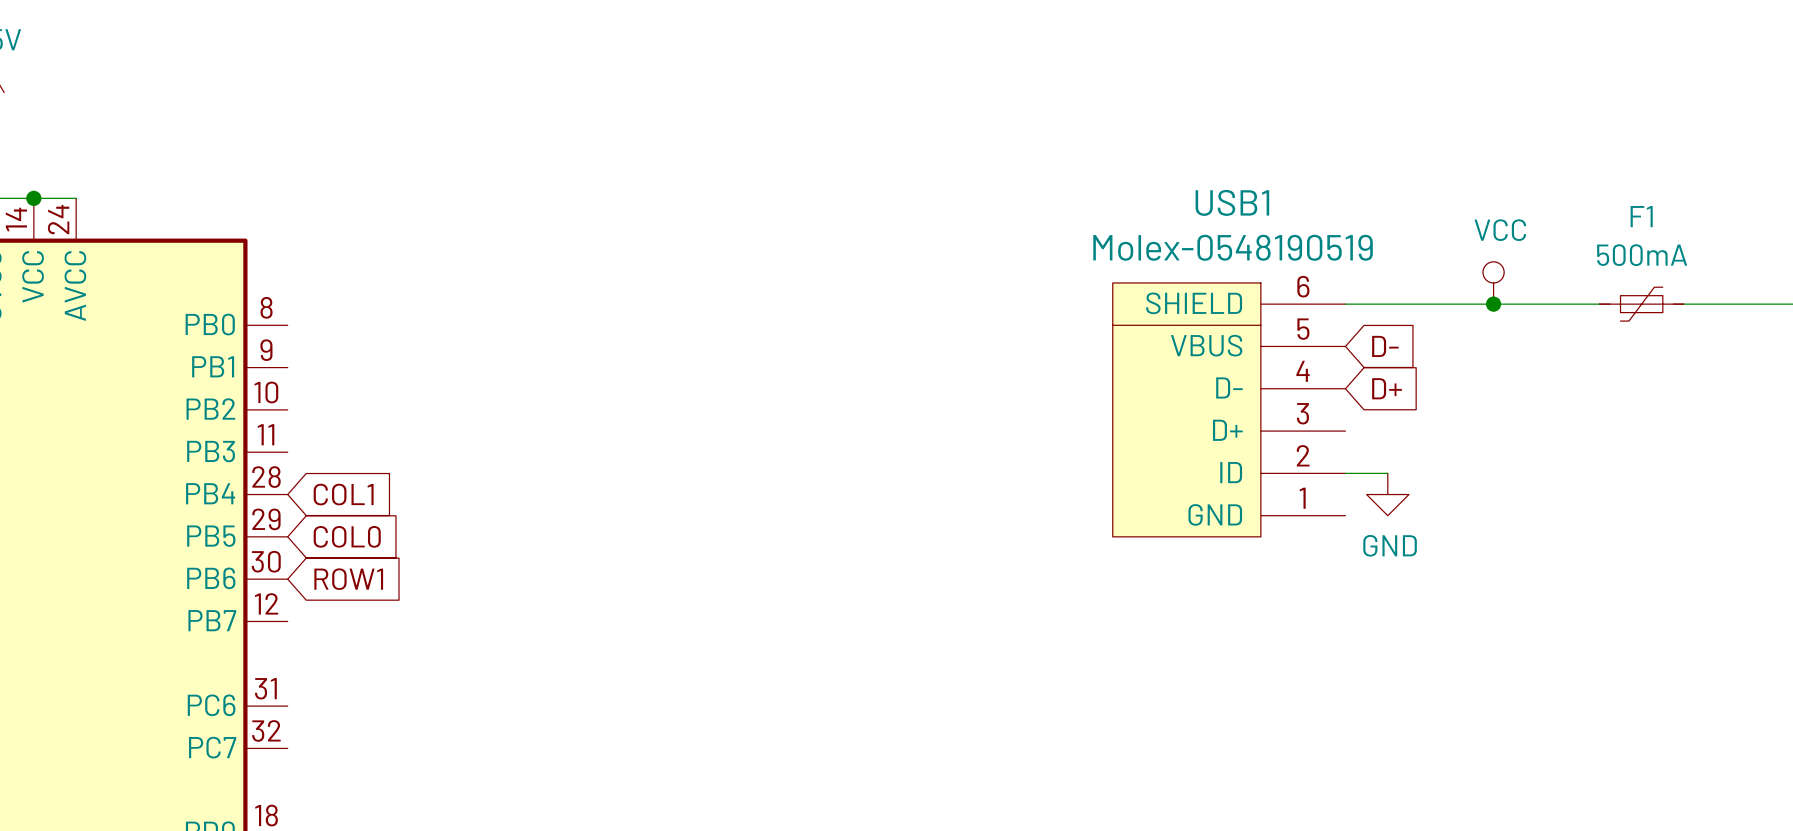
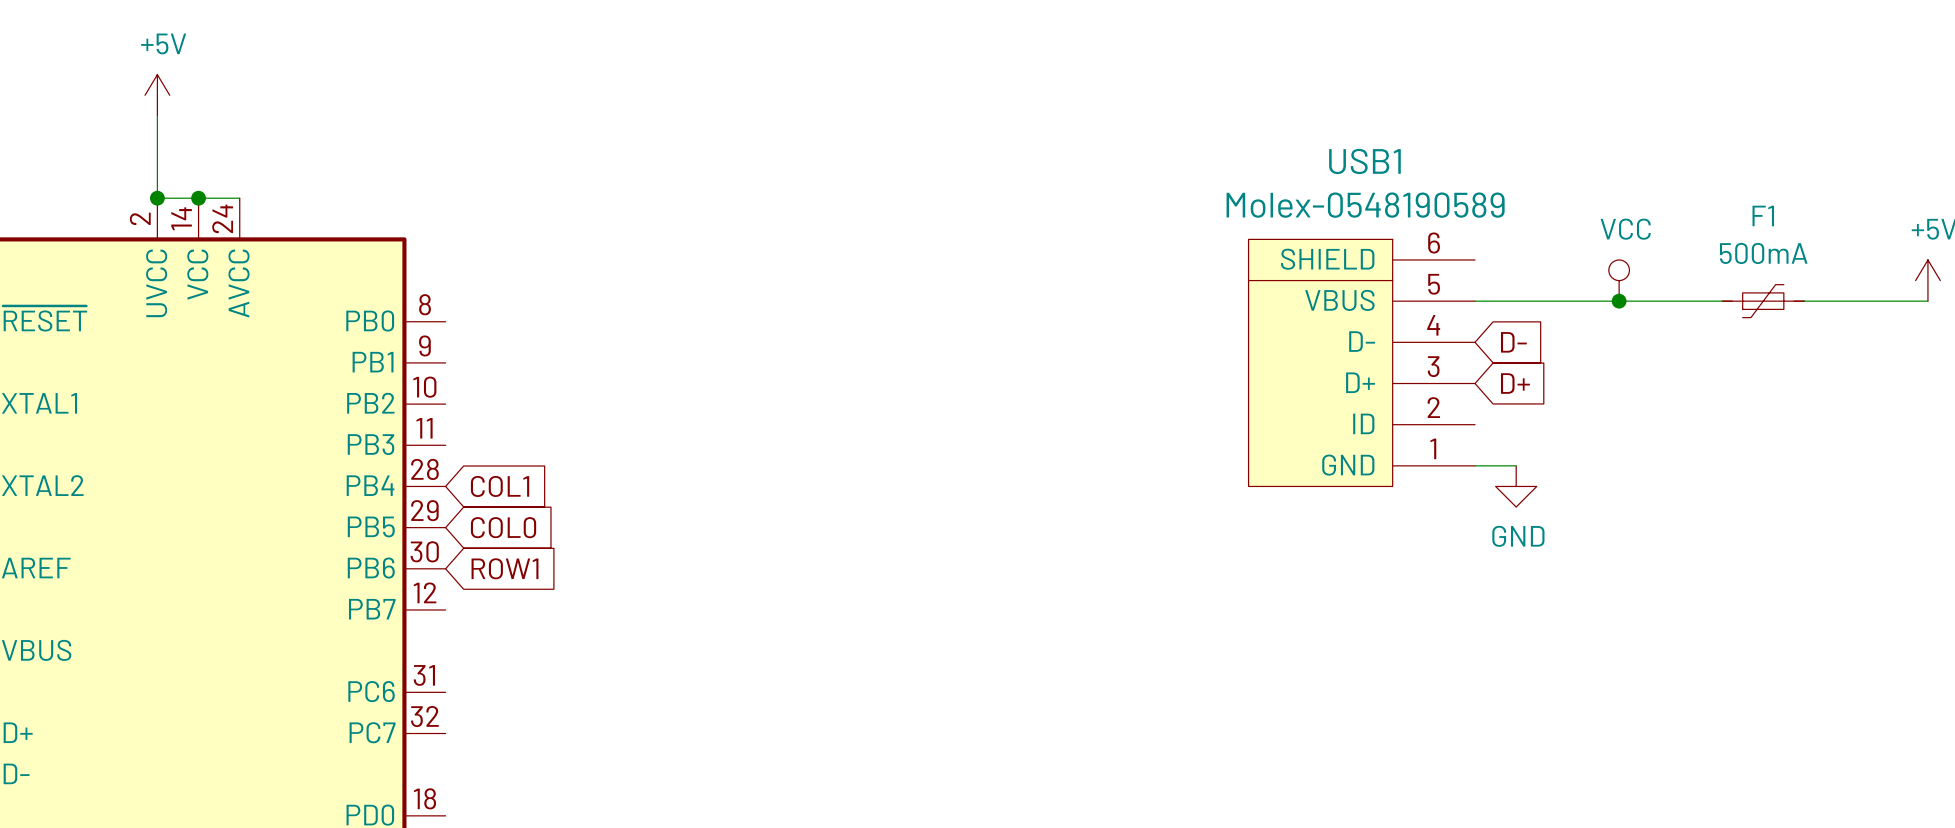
USB1 value: Molex-0548190519 (1233, 247) -> Molex-0548190589 (1365, 205)
USB1 position: (1229, 409) -> (1361, 362)

